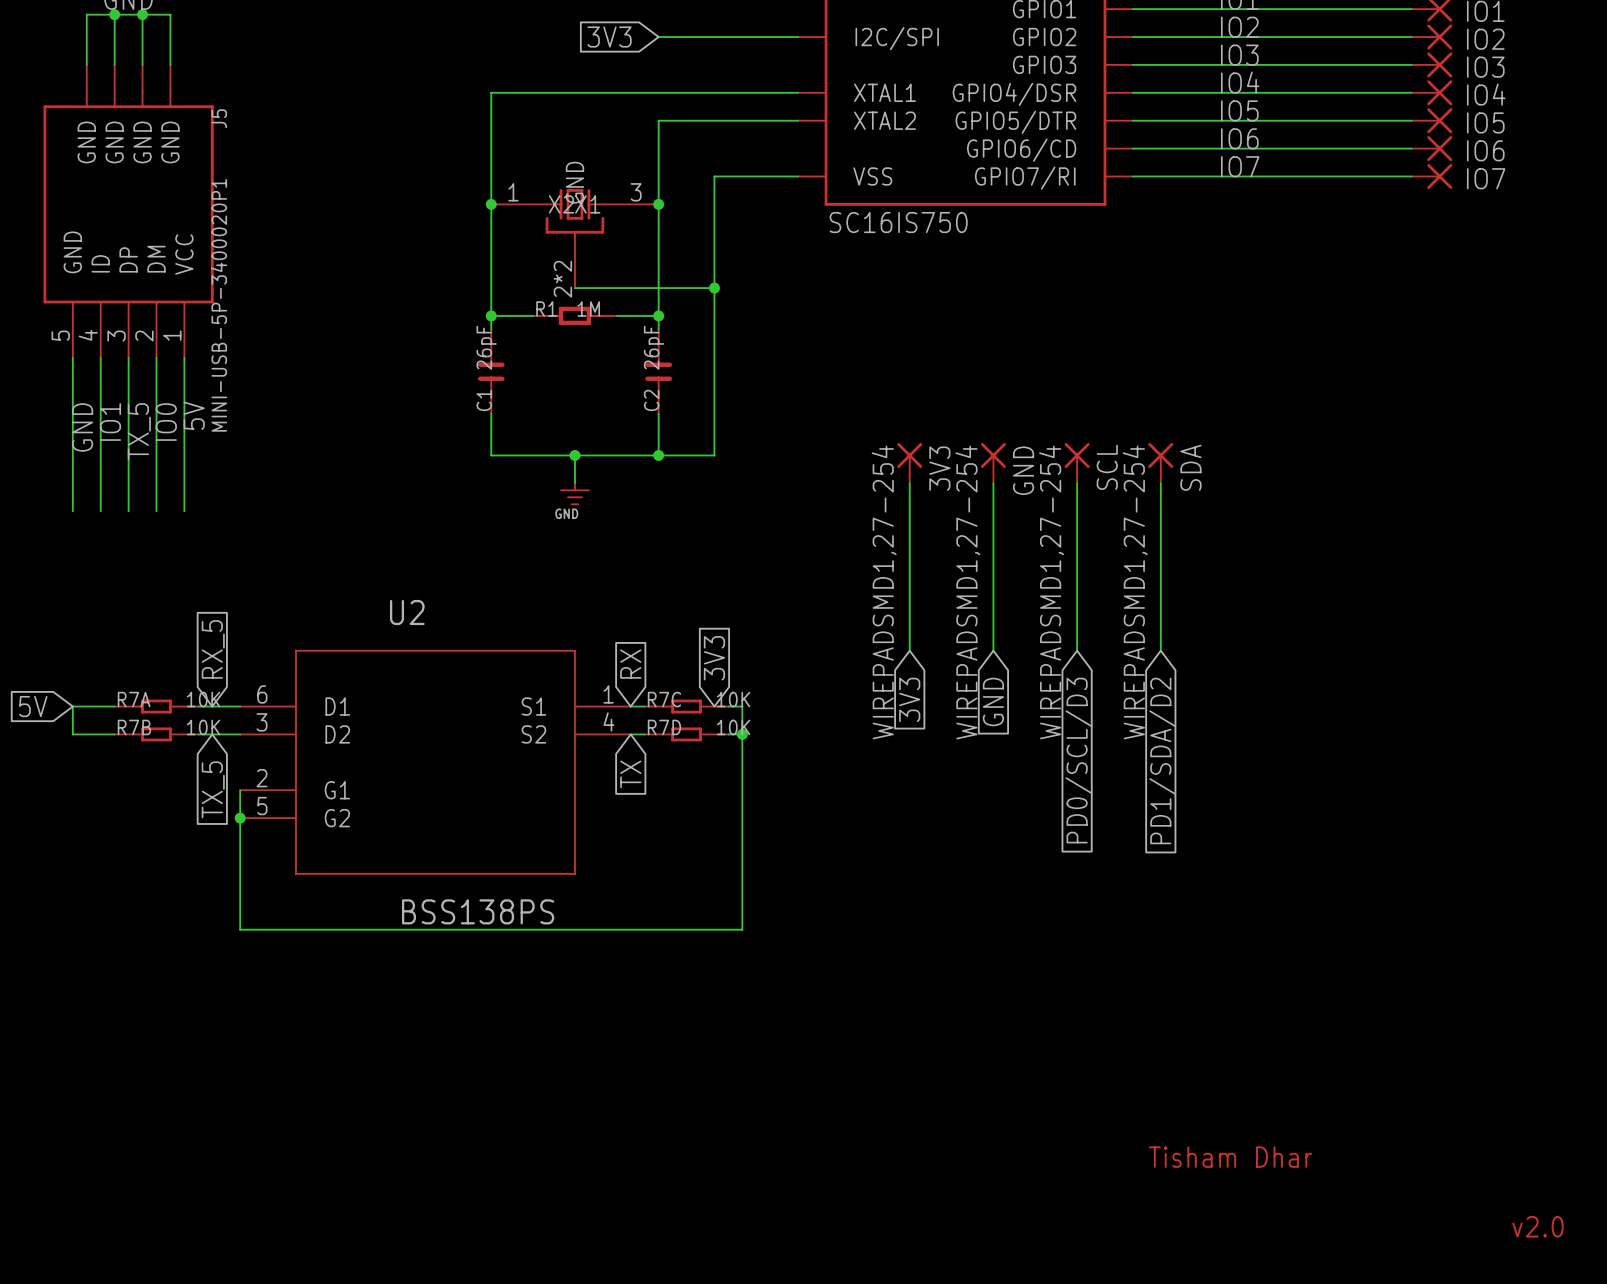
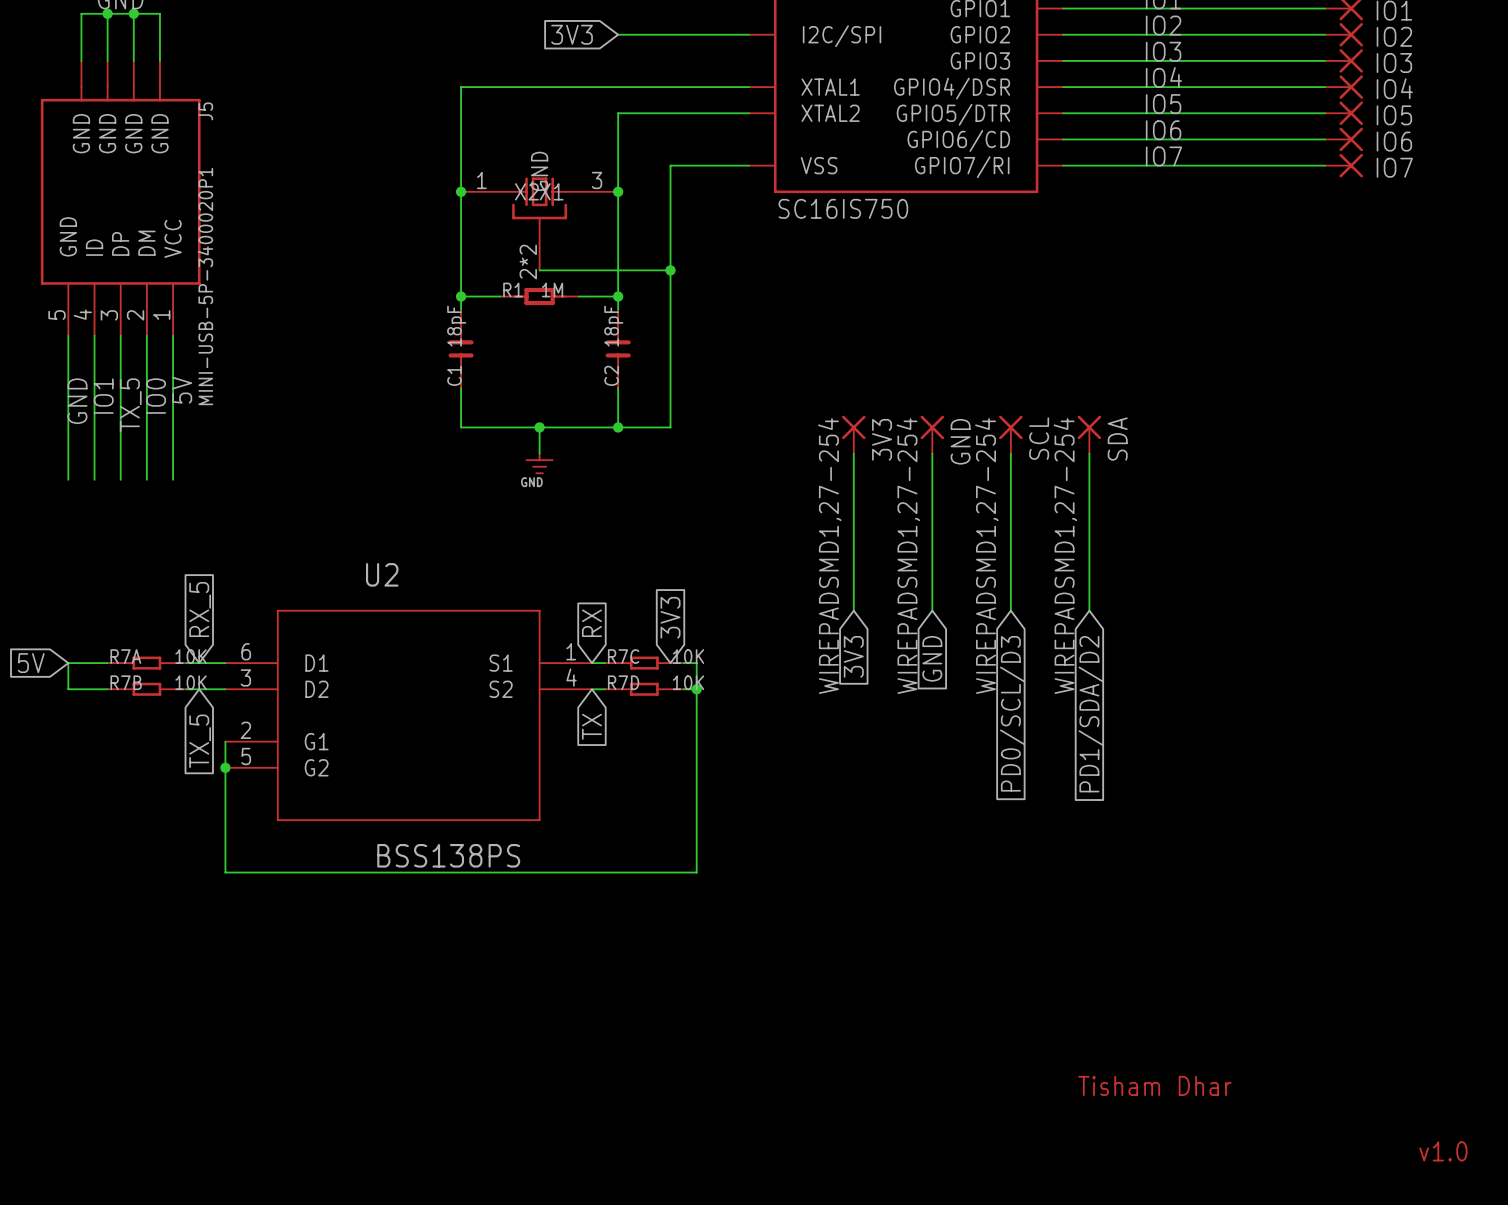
C1 value: 26pF (486, 347) -> 18pF (456, 326)
C2 value: 26pF (654, 347) -> 18pF (613, 326)
text: v2.0 (1538, 1226) -> v1.0 (1443, 1151)

